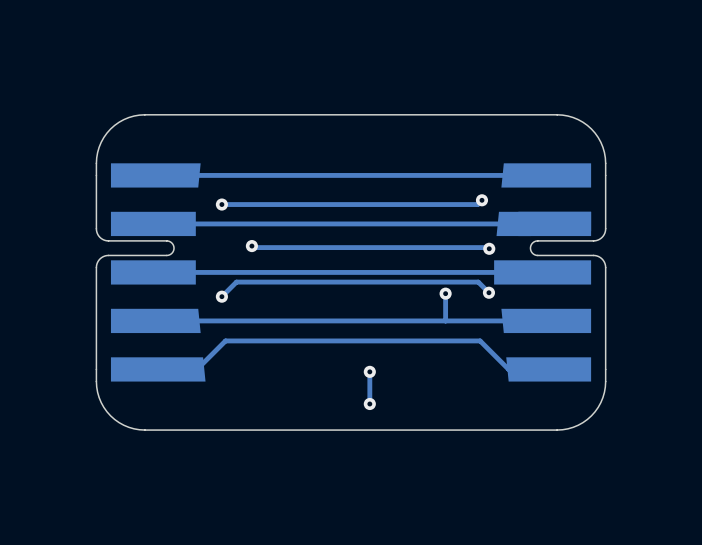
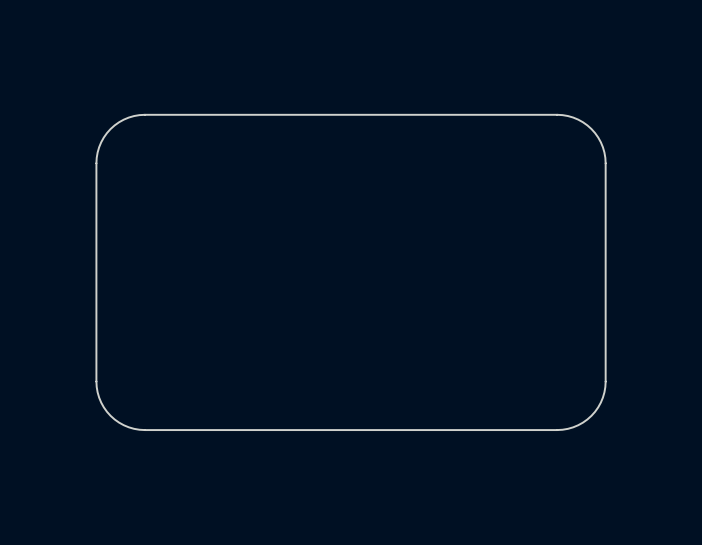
board edge: none -> (96, 175) (96, 369)
track: (547, 175) (154, 175) -> none
board edge: none -> (605, 175) (605, 369)
track: (481, 200) (477, 204) (221, 204) -> none
via: (481, 200) -> none
via: (221, 204) -> none
track: (554, 223) (153, 223) -> none
track: (251, 246) (489, 248) -> none
via: (251, 246) -> none
via: (489, 248) -> none
part: (150, 272) -> none
track: (542, 272) (153, 272) -> none
part: (550, 272) -> none
track: (488, 292) (478, 282) (236, 282) (221, 296) -> none
via: (488, 292) -> none
track: (445, 293) (445, 320) -> none
via: (445, 293) -> none
via: (221, 296) -> none
track: (547, 320) (154, 320) -> none
track: (549, 369) (508, 369) (480, 340) (225, 340) (197, 369) (157, 369) -> none
track: (369, 371) (369, 403) -> none
via: (369, 371) -> none
via: (369, 403) -> none

